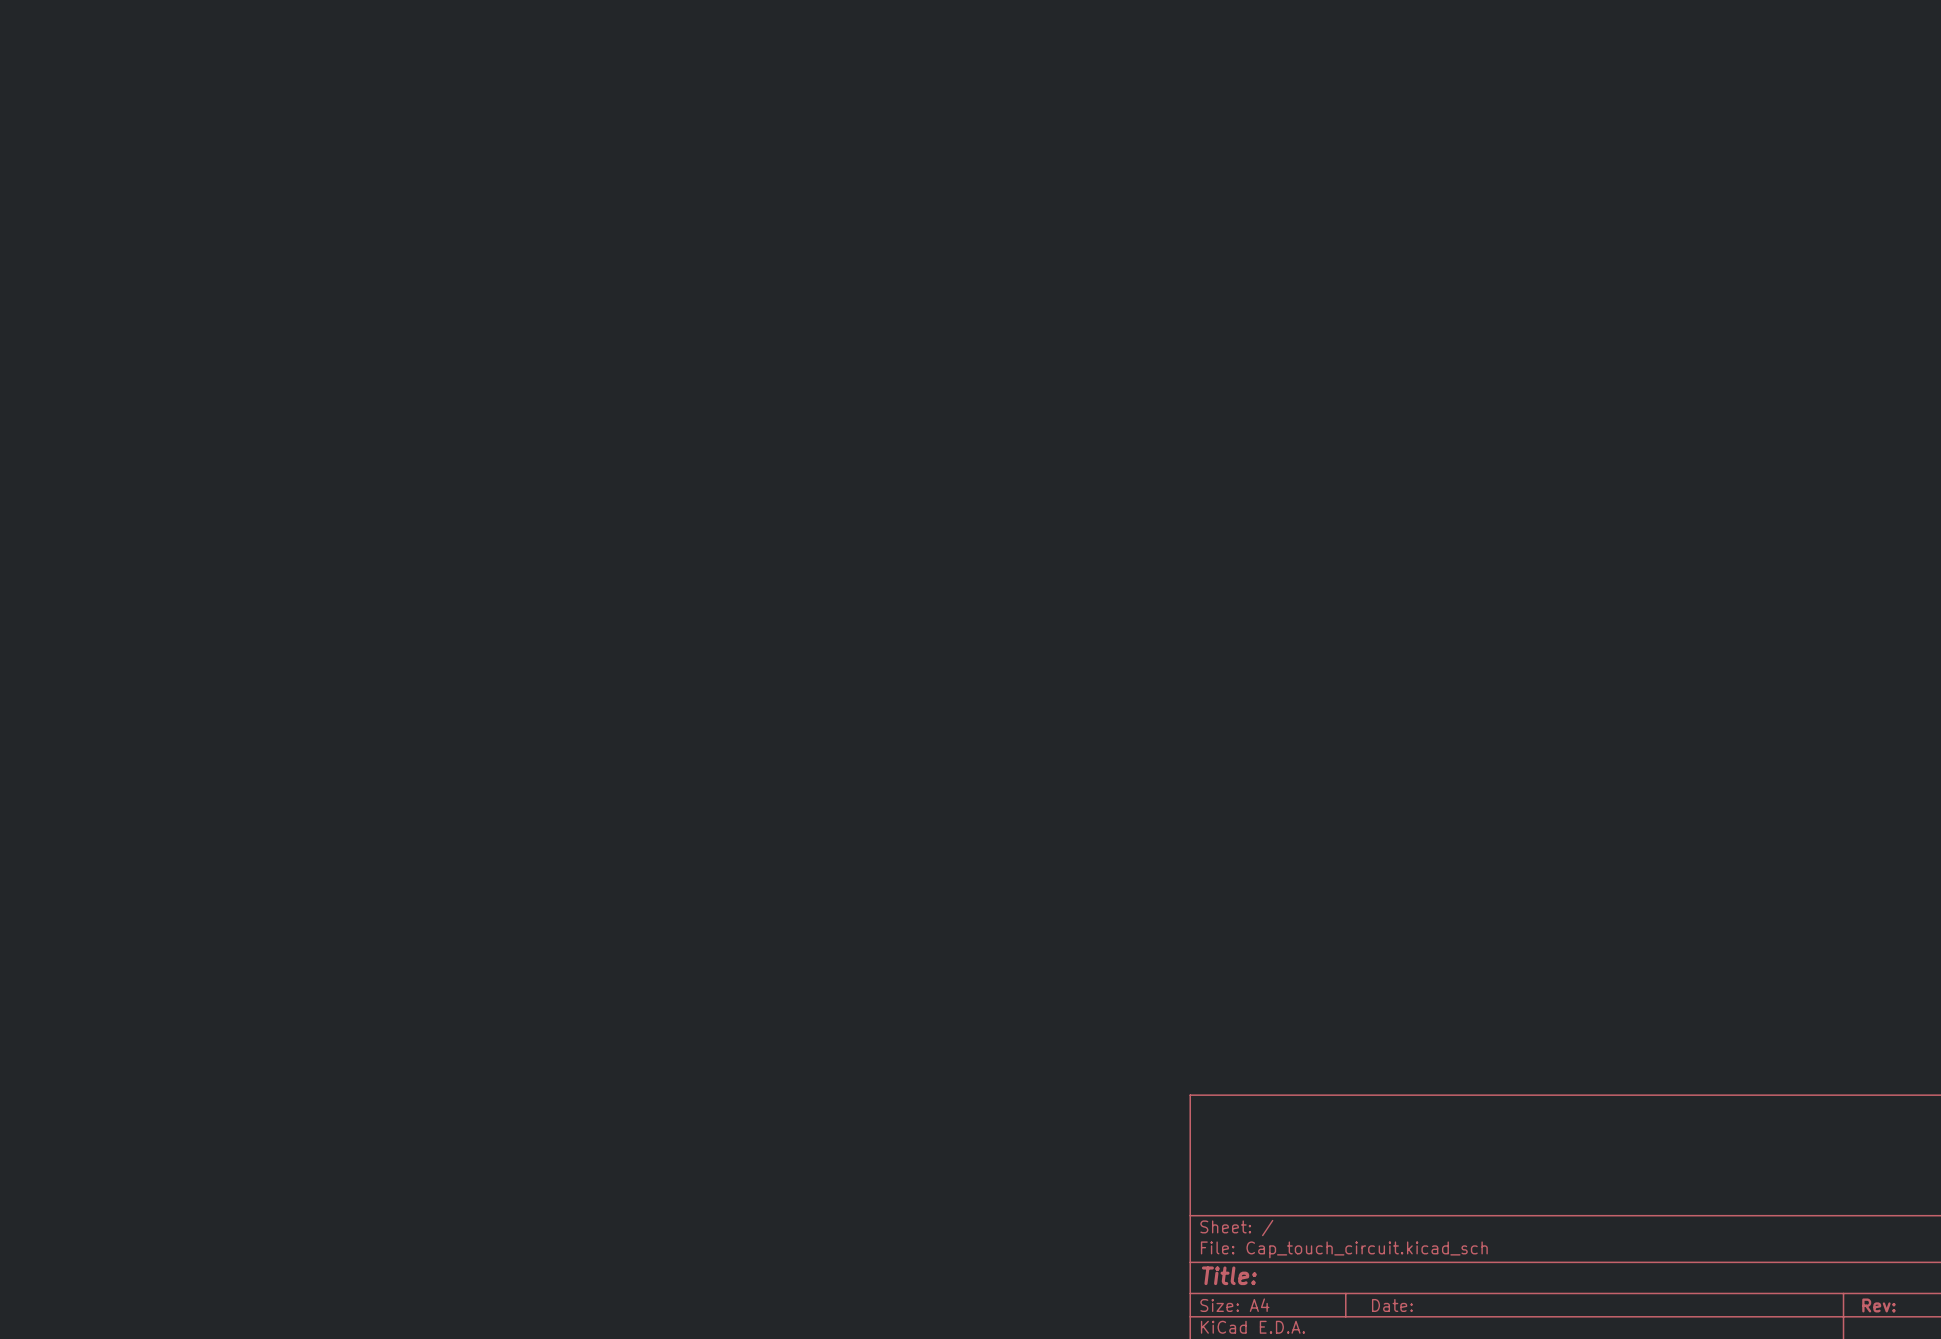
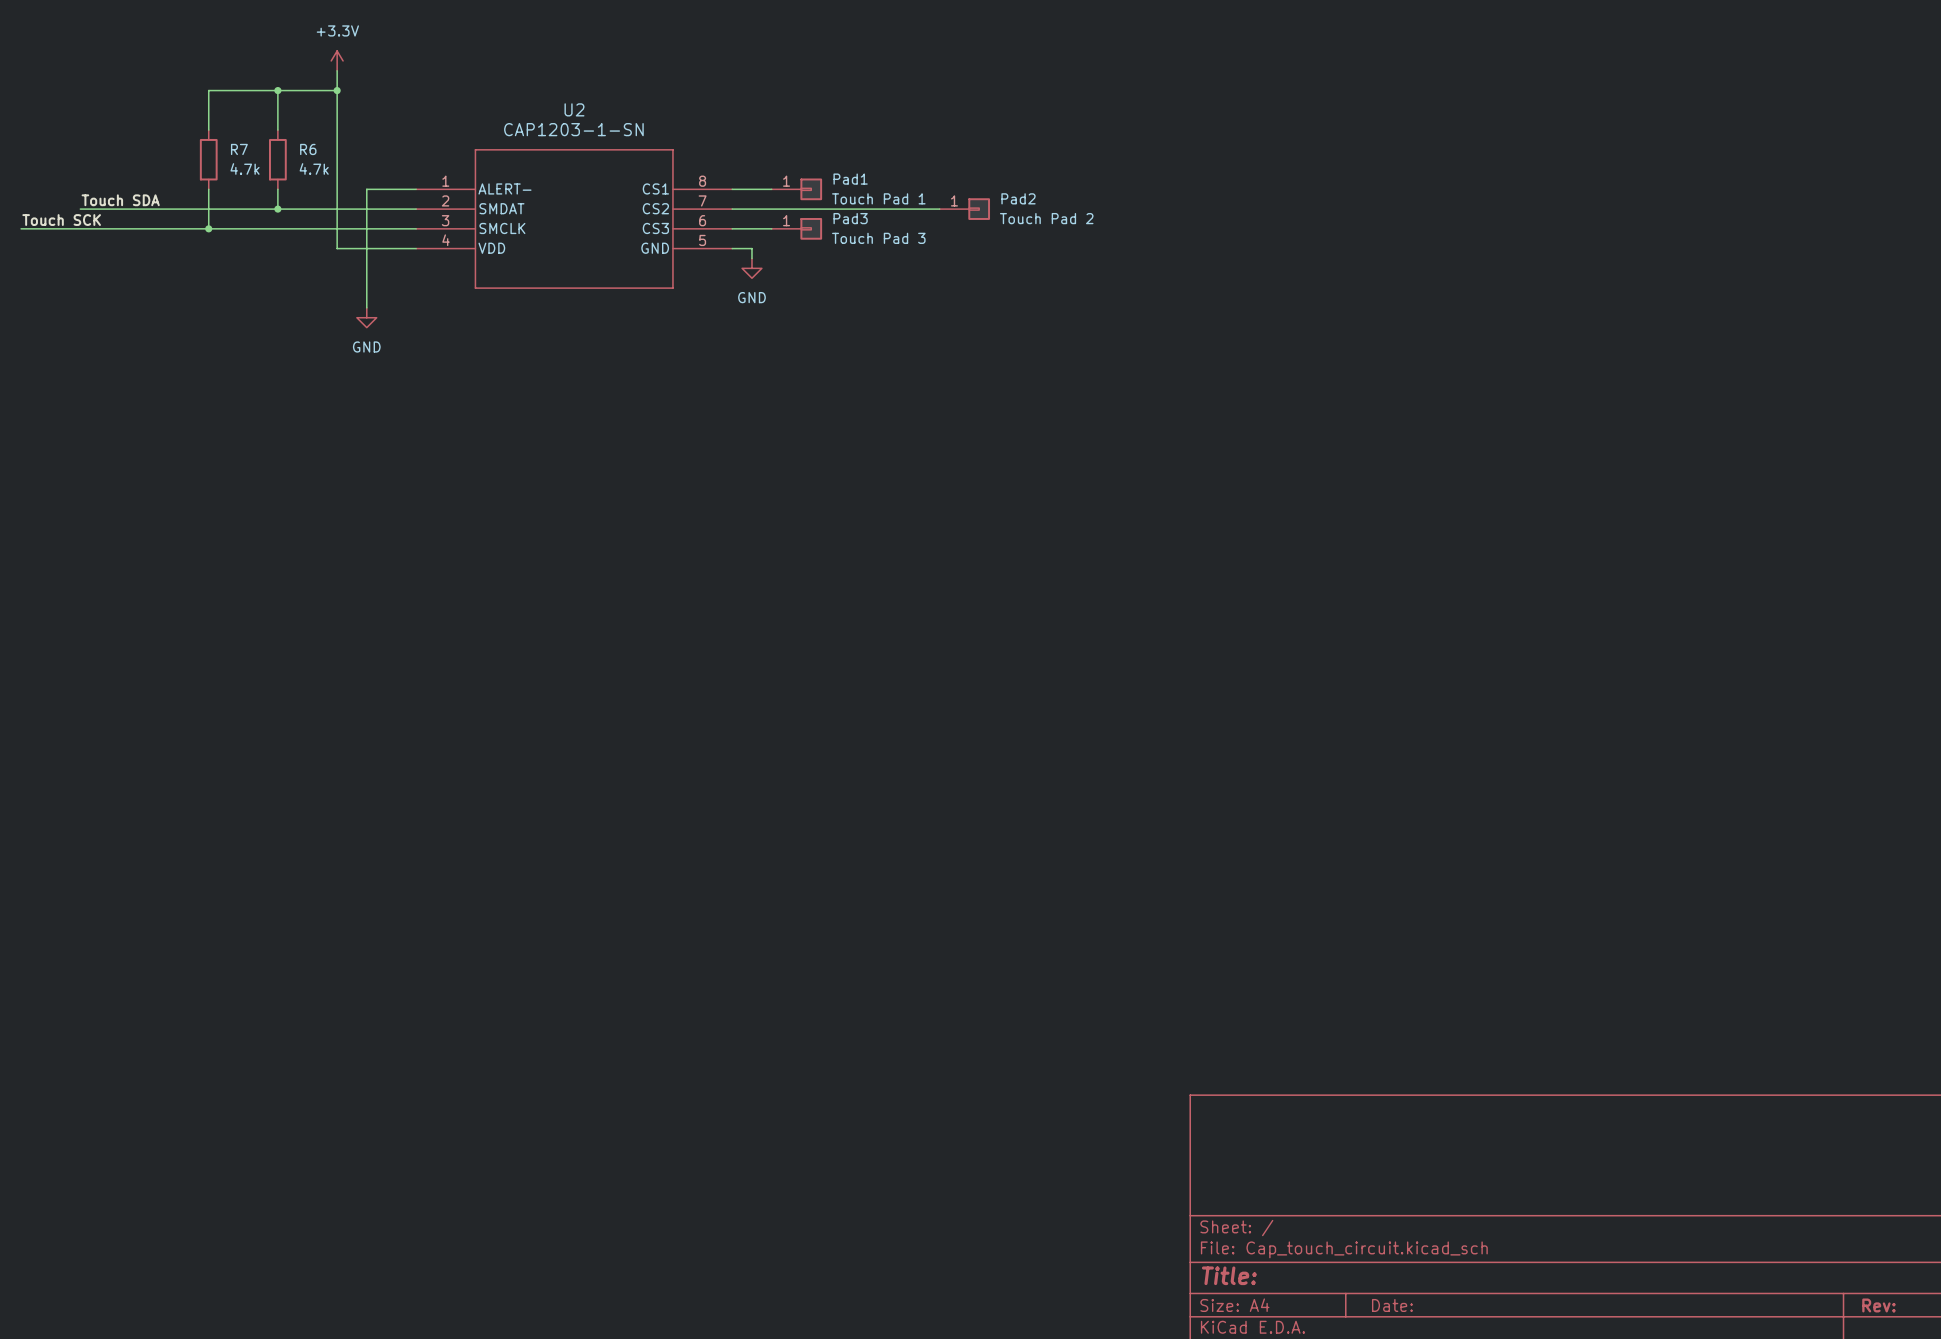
power symbol: none -> +3.3V (337, 60)
wire: none -> (337, 70) (337, 248) (416, 248)
wire: none -> (277, 90) (277, 130)
junction: none -> (277, 90)
wire: none -> (337, 90) (208, 90) (208, 130)
junction: none -> (337, 90)
R7: none -> 4.7k (208, 159)
R6: none -> 4.7k (277, 159)
wire: none -> (208, 189) (208, 228)
wire: none -> (277, 189) (277, 209)
wire: none -> (416, 189) (366, 189) (366, 307)
wire: none -> (732, 189) (771, 189)
Pad1: none -> Touch Pad 1 (796, 189)
label: none -> Touch SDA (120, 200)
wire: none -> (80, 209) (416, 209)
junction: none -> (277, 209)
wire: none -> (732, 209) (939, 209)
Pad2: none -> Touch Pad 2 (964, 209)
U2: none -> CAP1203-1-SN (574, 218)
label: none -> Touch SCK (61, 220)
wire: none -> (21, 228) (416, 228)
junction: none -> (208, 228)
wire: none -> (732, 228) (771, 228)
Pad3: none -> Touch Pad 3 (796, 228)
wire: none -> (732, 248) (751, 248) (751, 258)
power symbol: none -> GND (751, 268)
power symbol: none -> GND (366, 317)

